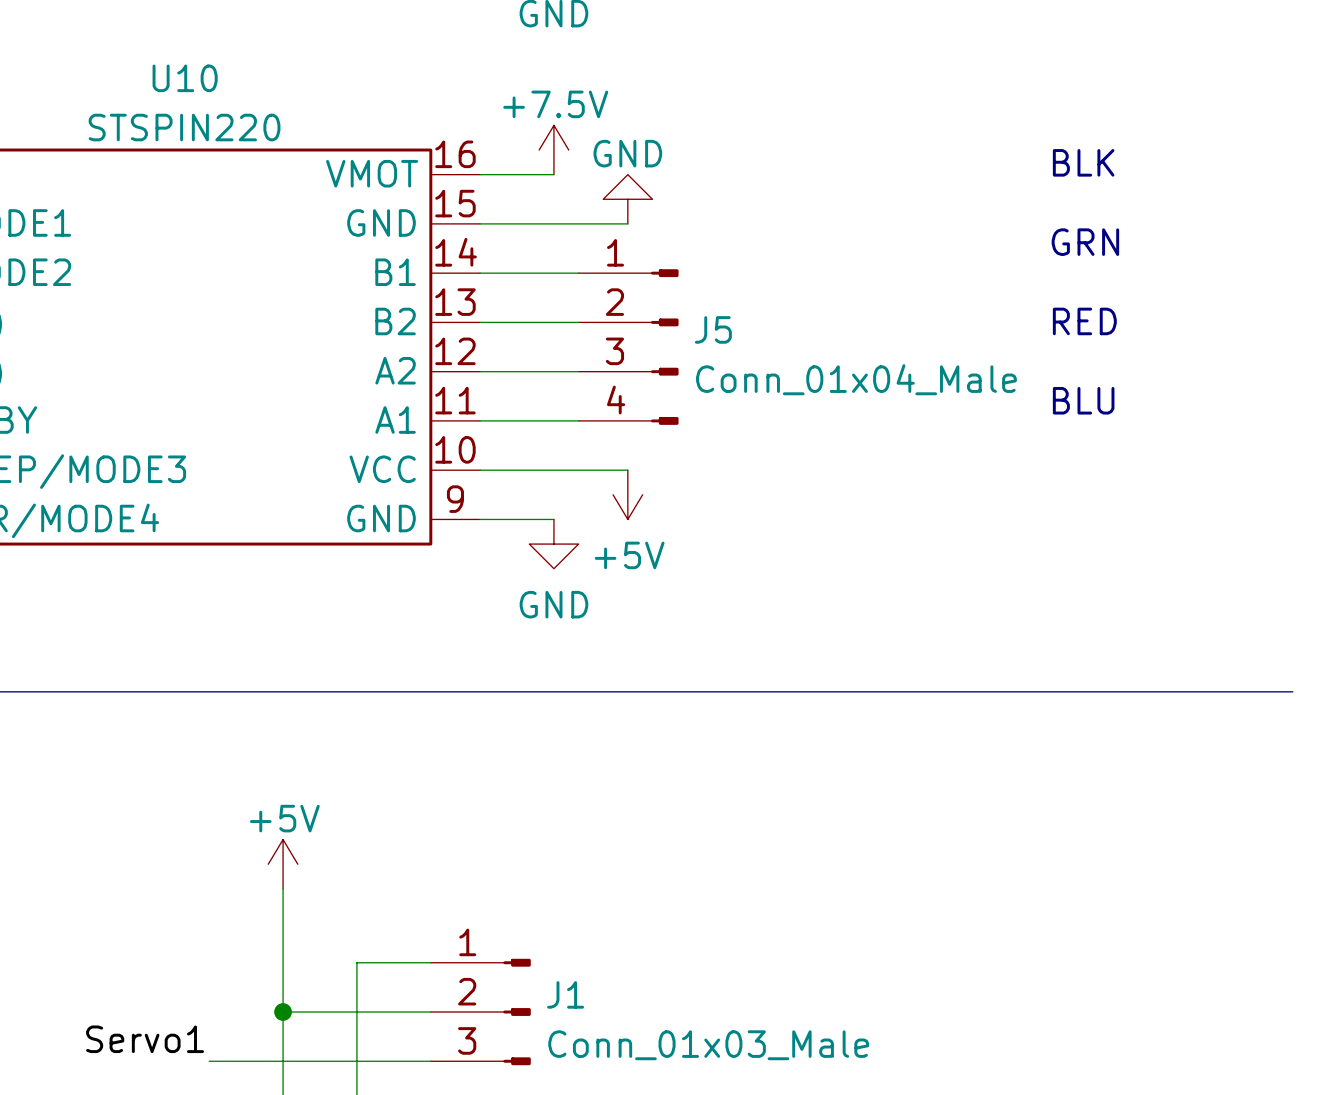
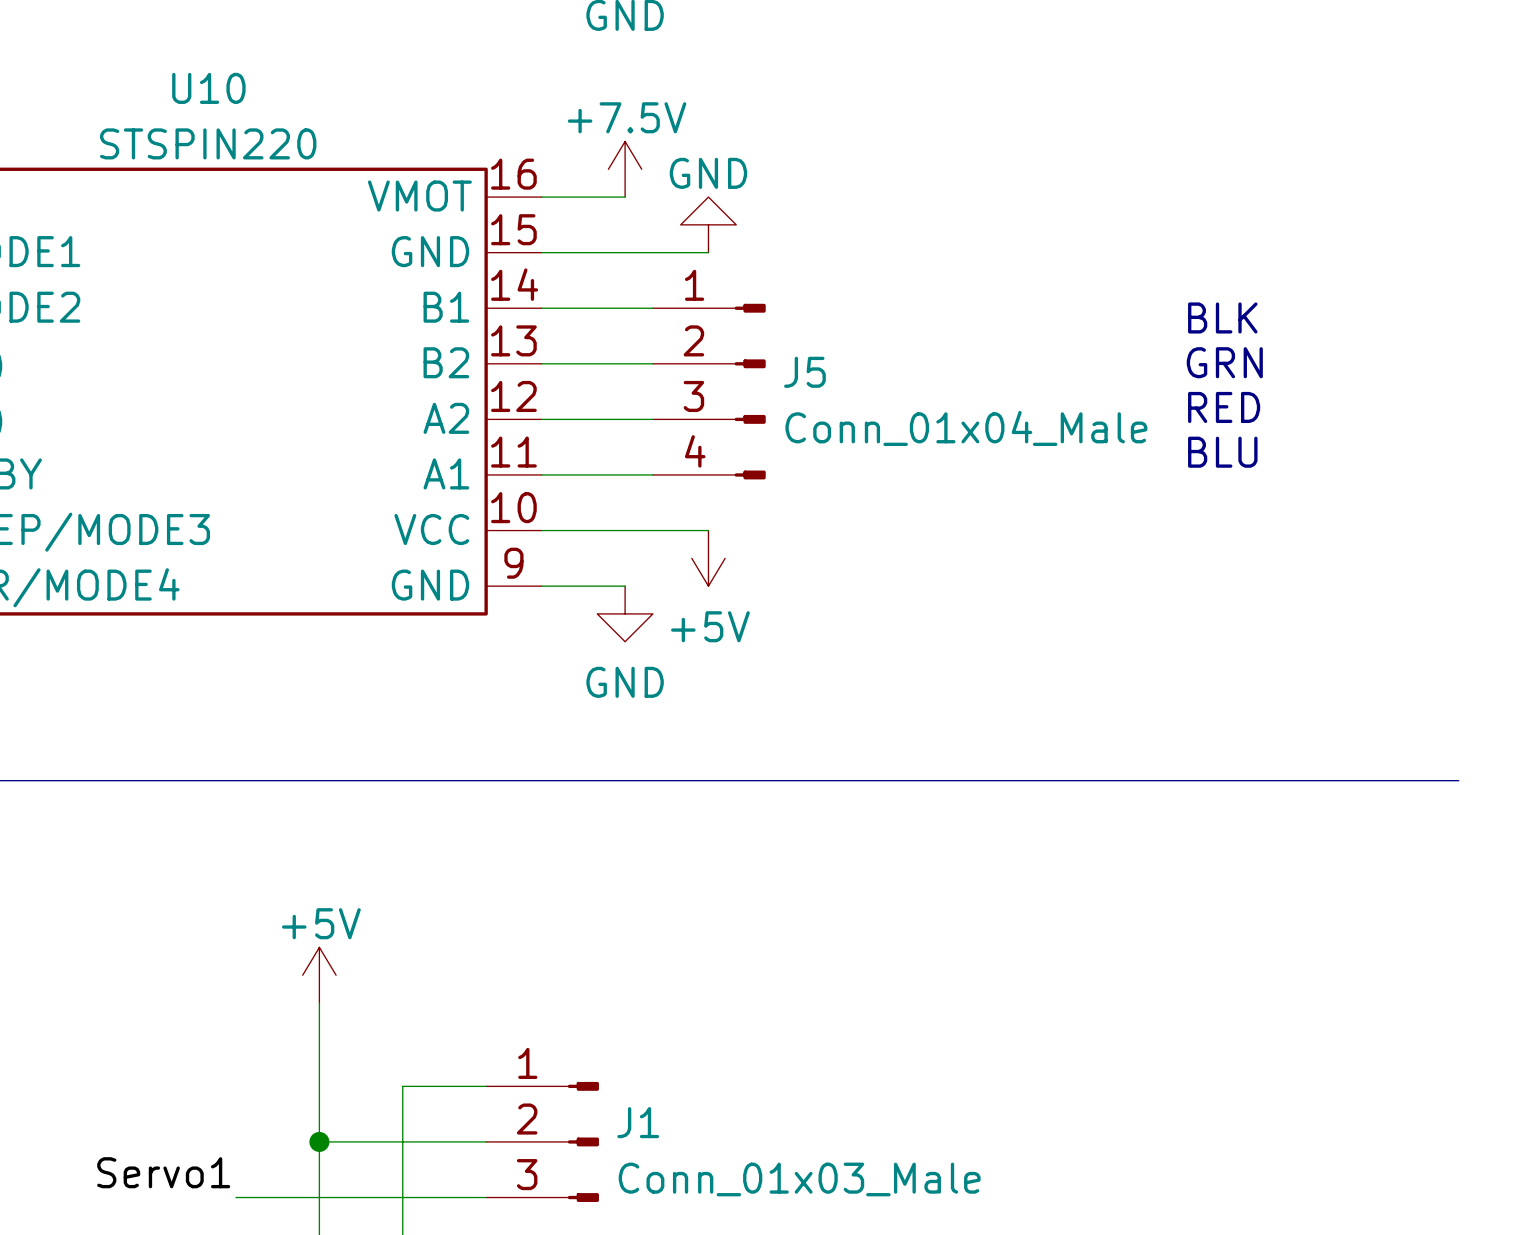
text position: BLK (1083, 162) -> BLK (1222, 317)
text: GRN (1085, 242) -> none
text: RED (1084, 321) -> GRN (1224, 362)
text: none -> RED (1224, 407)

